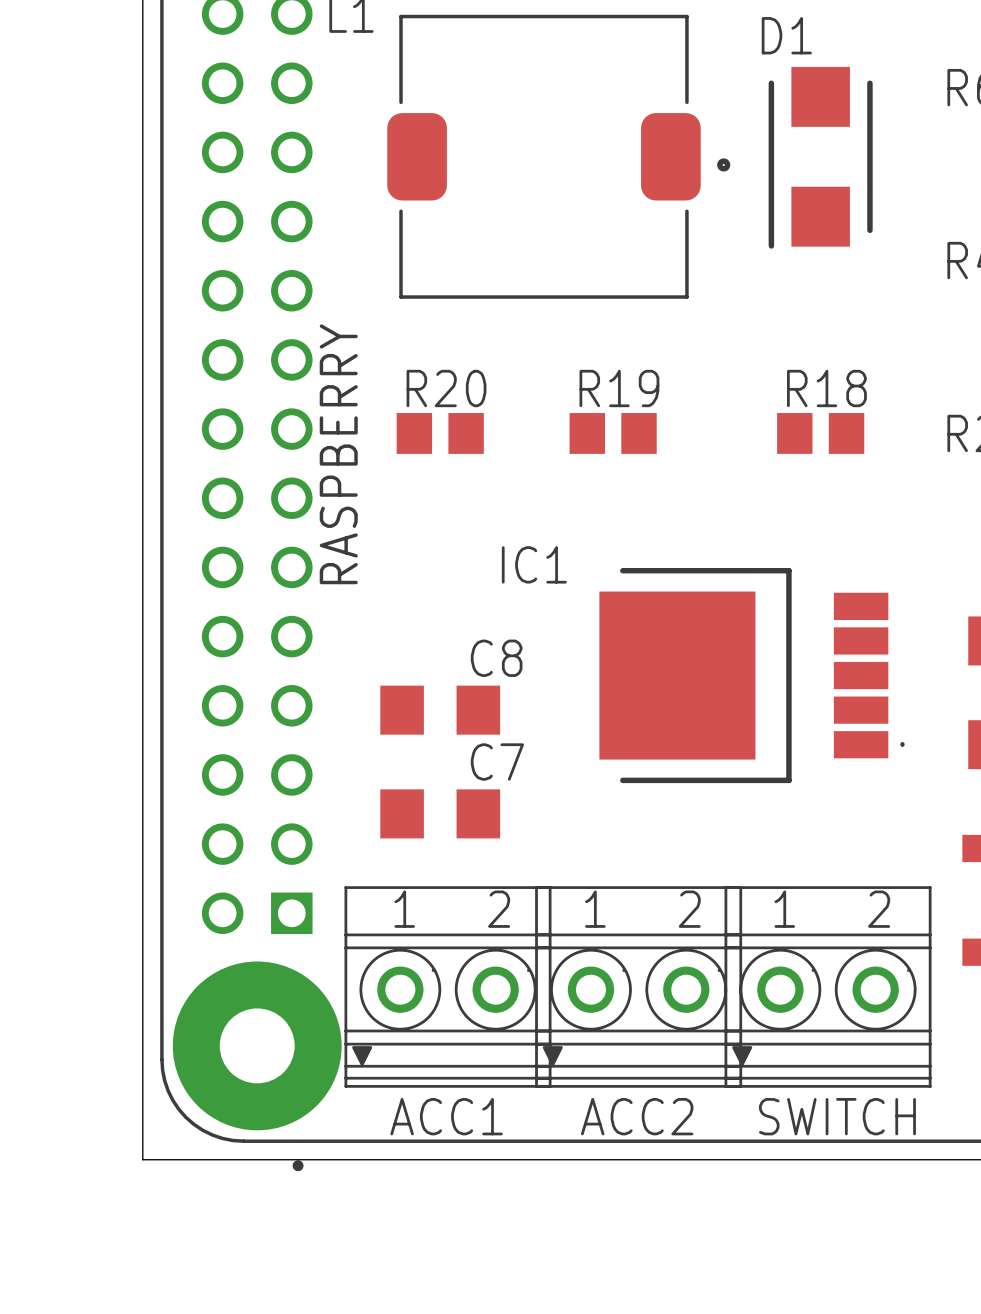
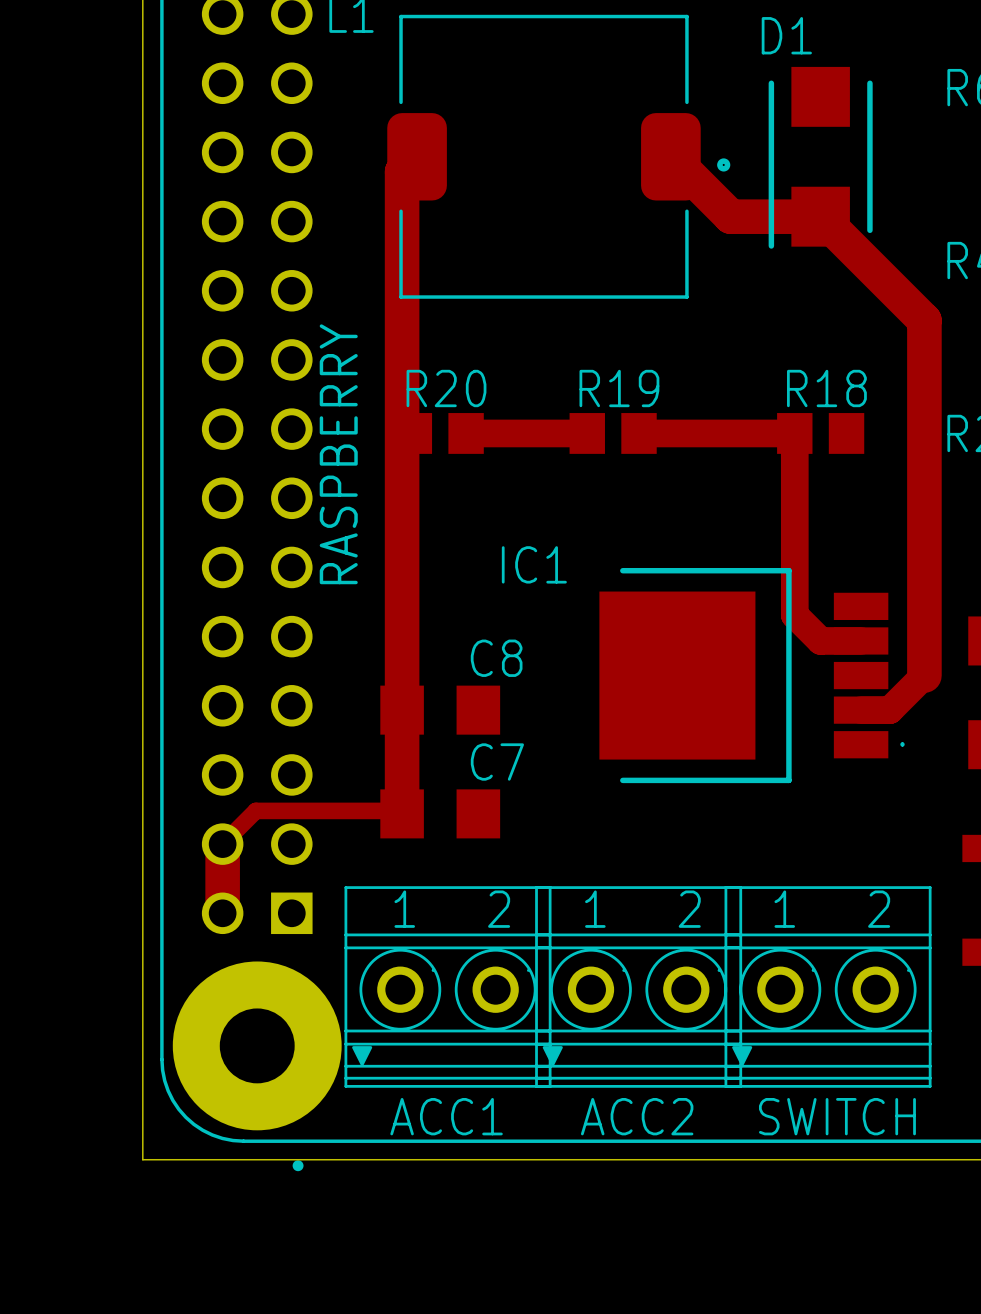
top track: none -> (417, 156) (402, 171) (402, 813) (402, 810) (255, 810) (222, 844) (222, 913) (232, 913)
top track: none -> (670, 156) (730, 216) (820, 216) (924, 320) (924, 675) (889, 710) (861, 710)
top track: none -> (466, 433) (587, 433)
top track: none -> (639, 433) (794, 433) (794, 615) (820, 640) (861, 640)

